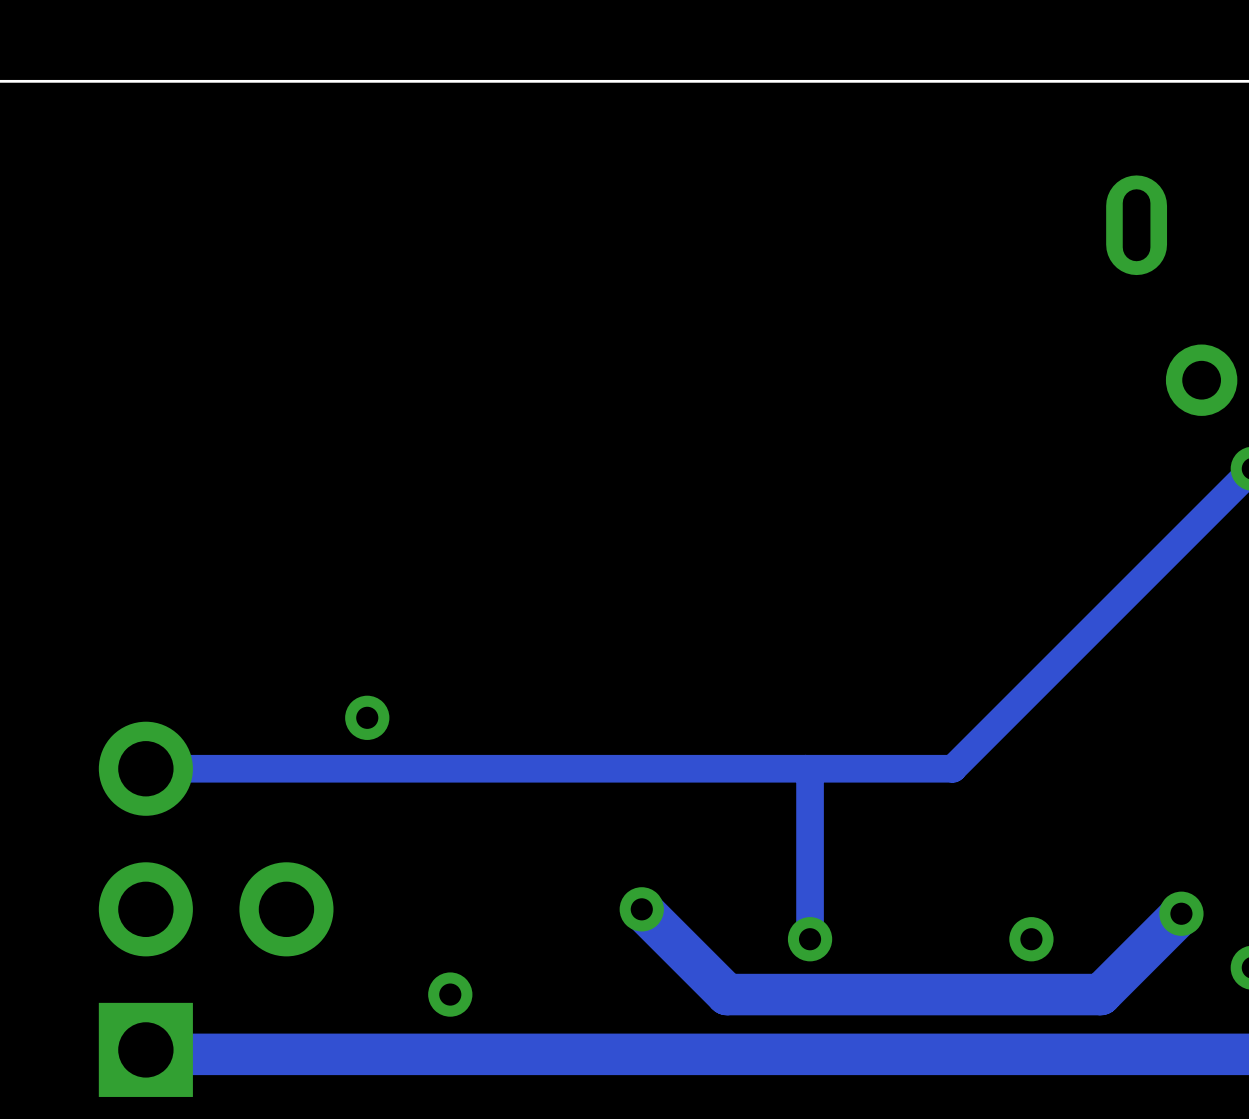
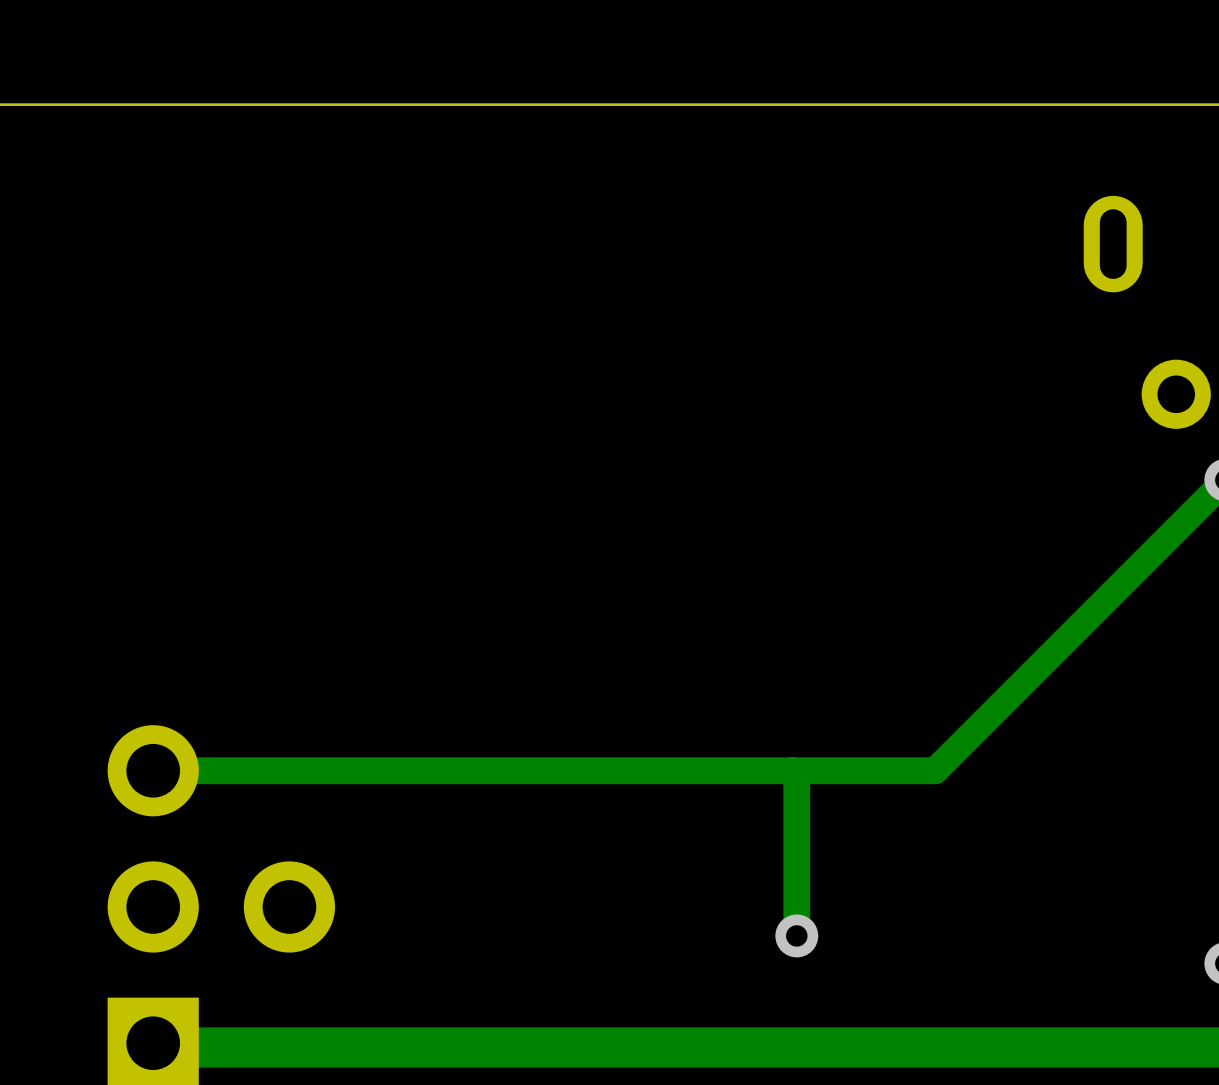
via: (367, 717) -> none
track: (641, 909) (727, 994) (1100, 994) (1181, 913) -> none
via: (641, 909) -> none
via: (1181, 913) -> none
via: (1031, 939) -> none
via: (450, 994) -> none

